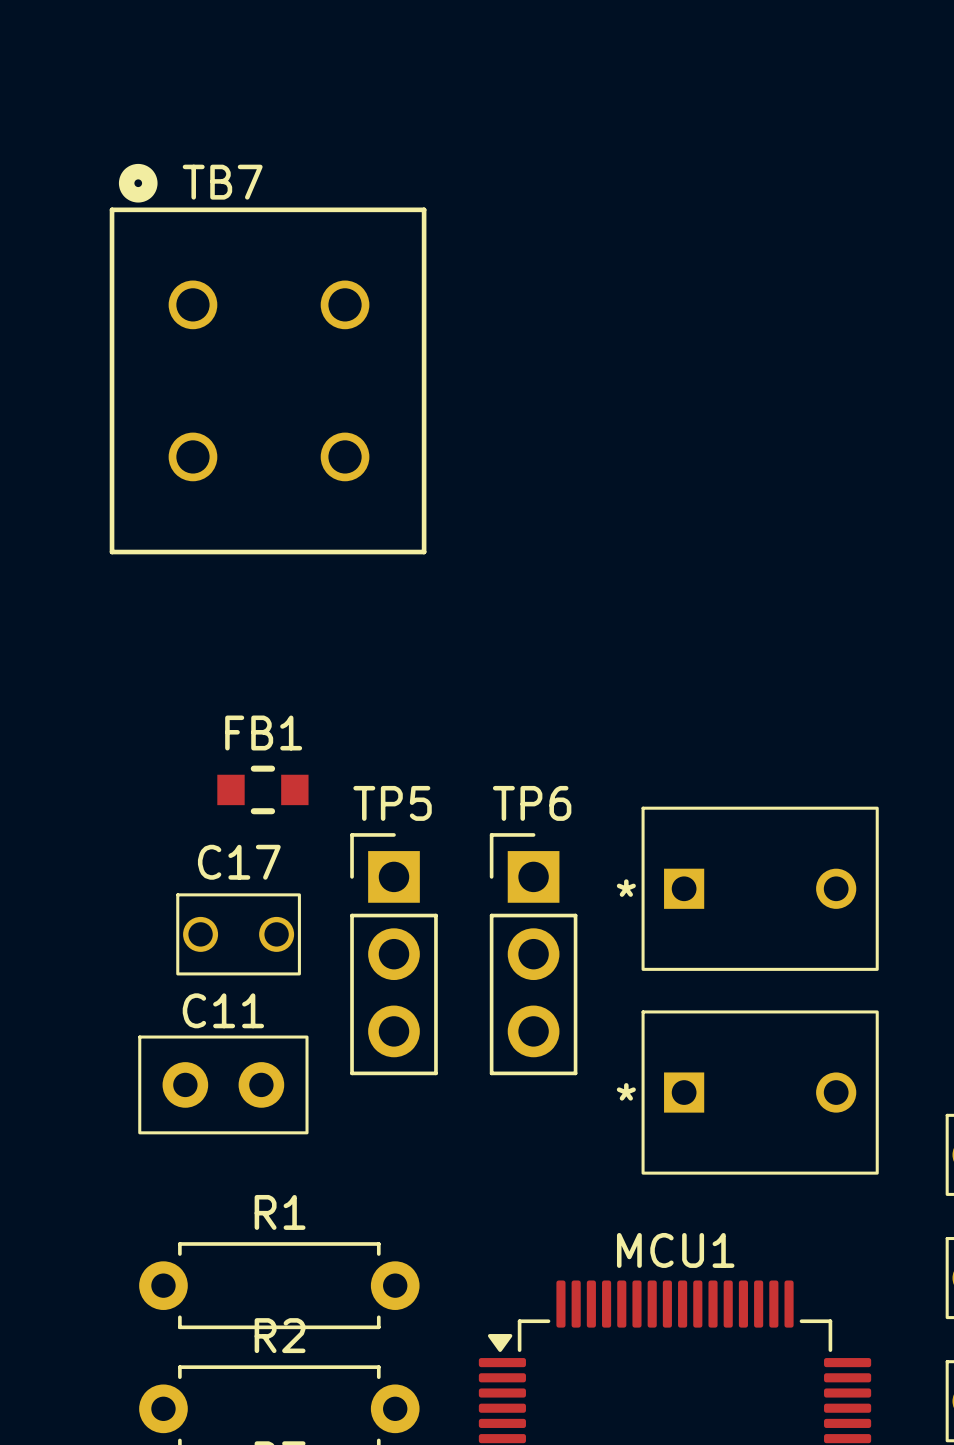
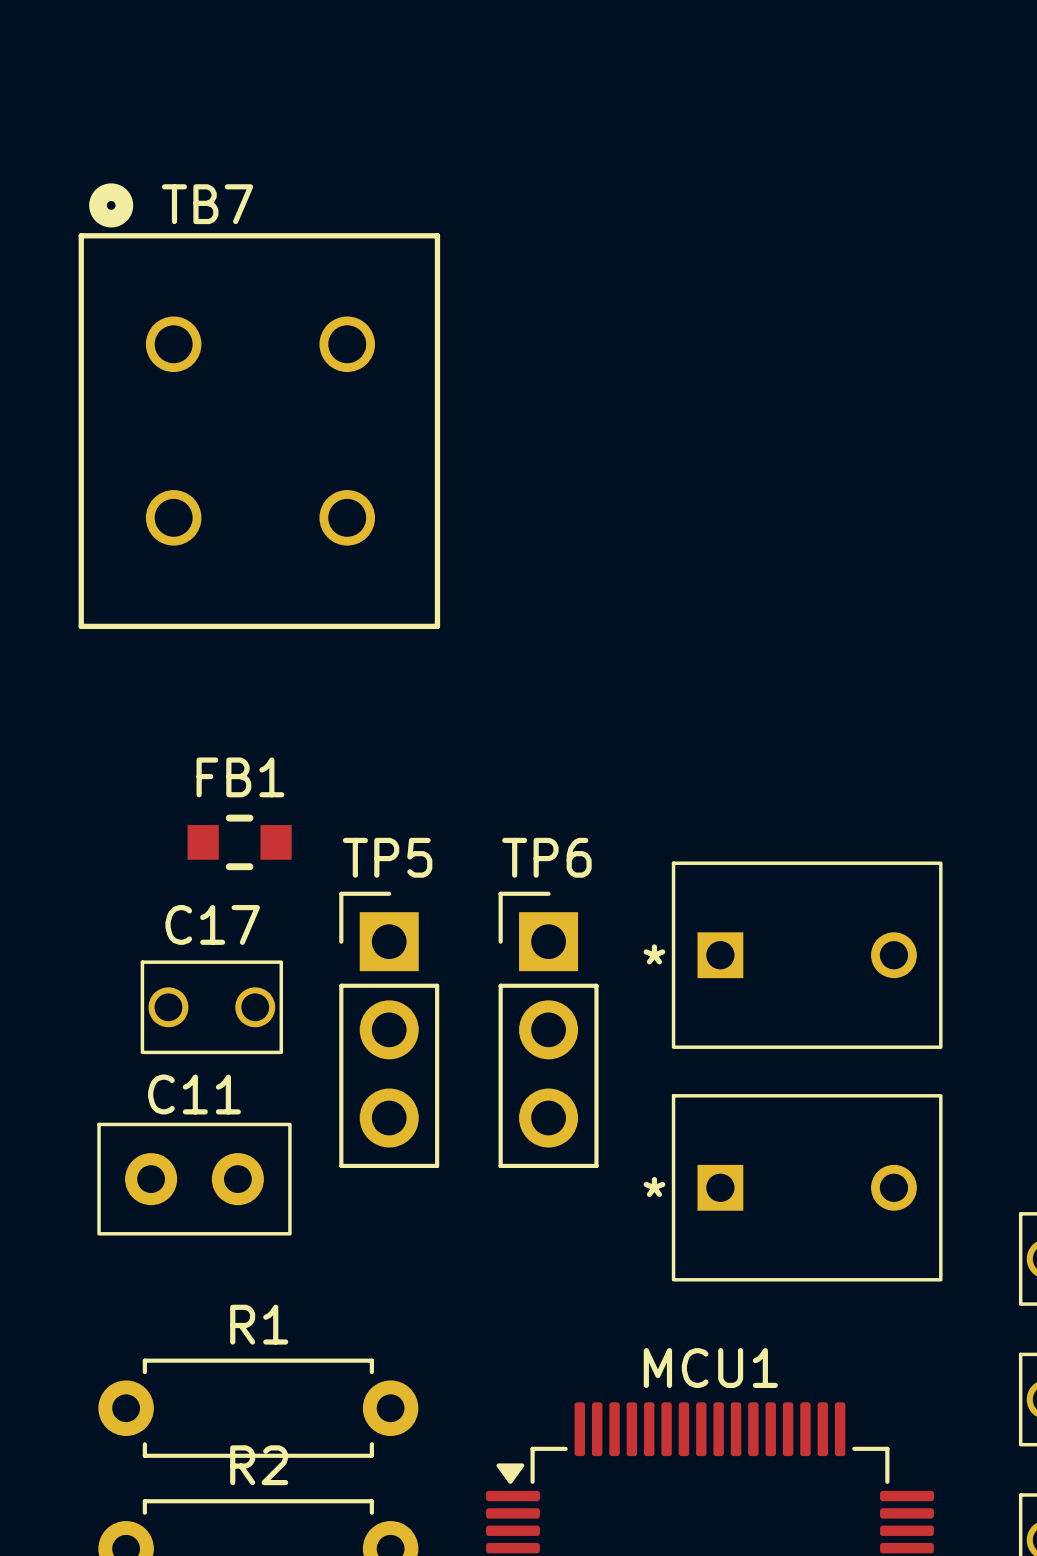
TB7 position: (268, 359) -> (259, 406)

